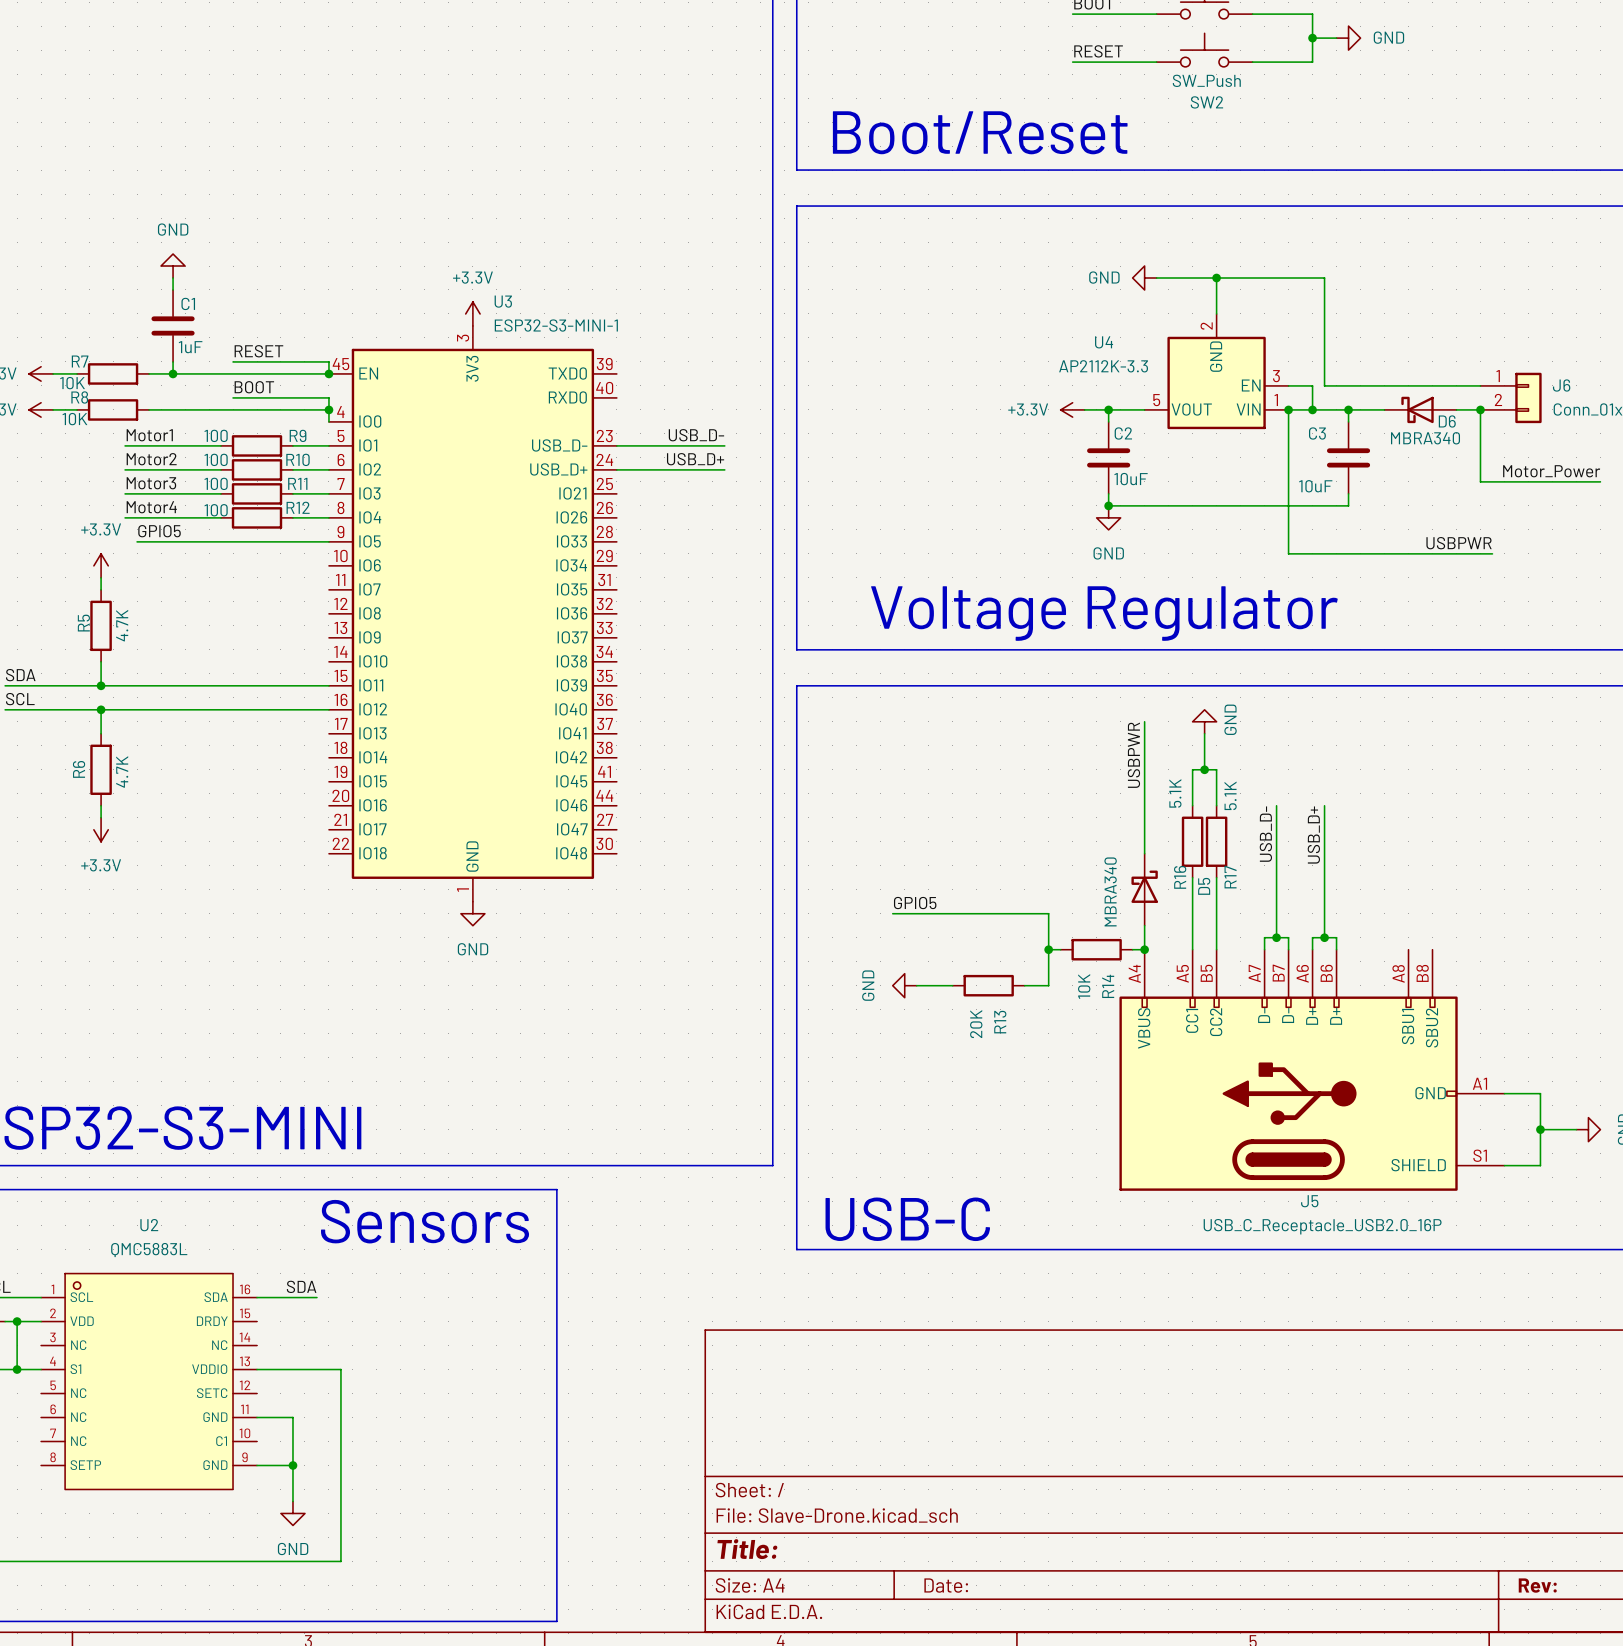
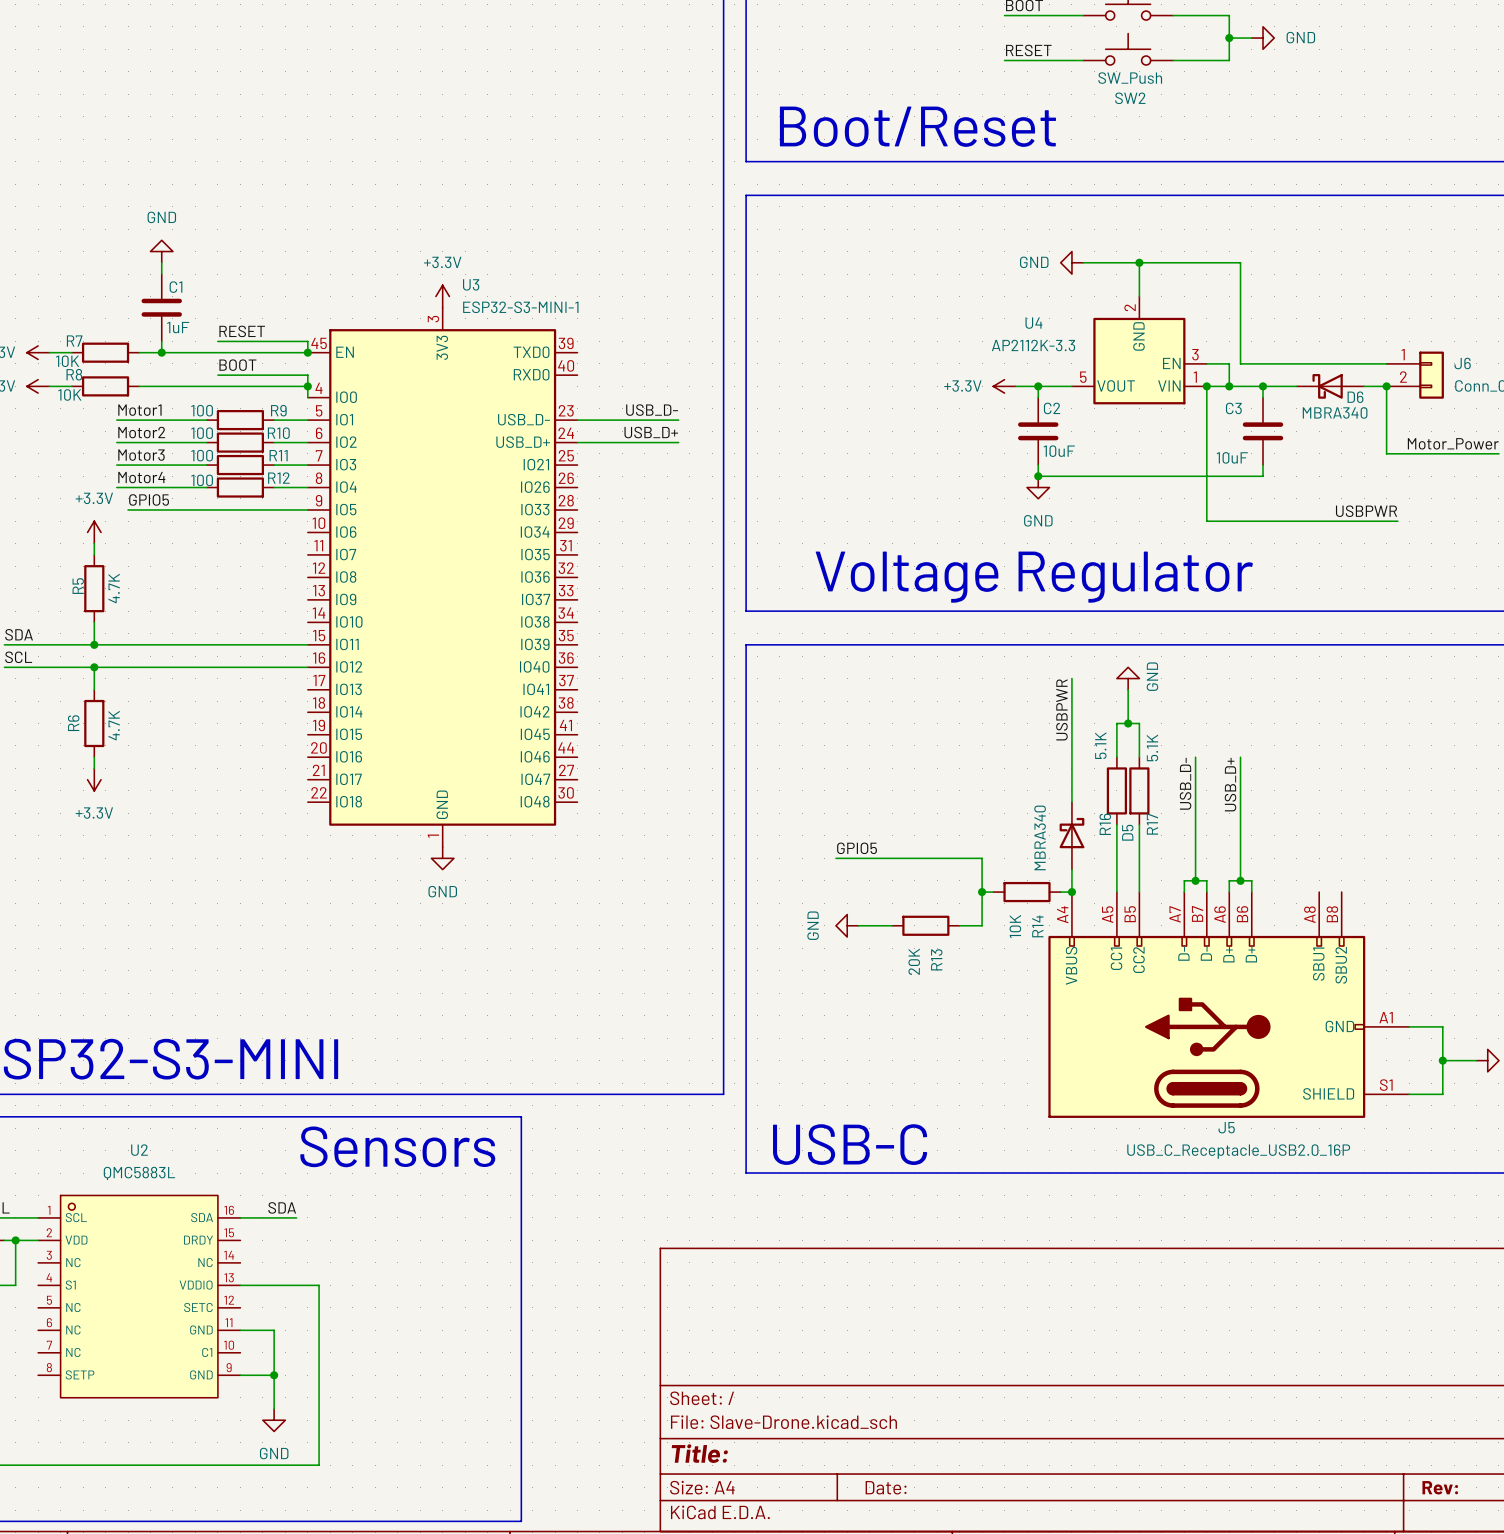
wire: (17, 1369) (41, 1369) -> none
junction: (17, 1369) -> none

